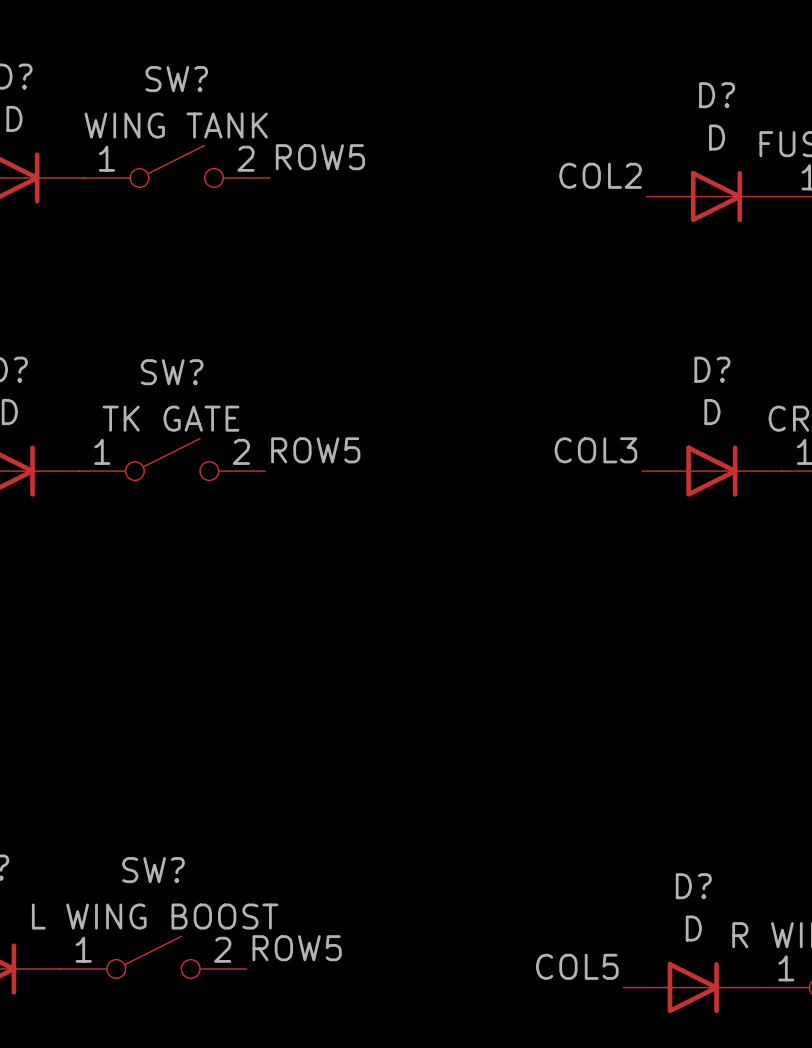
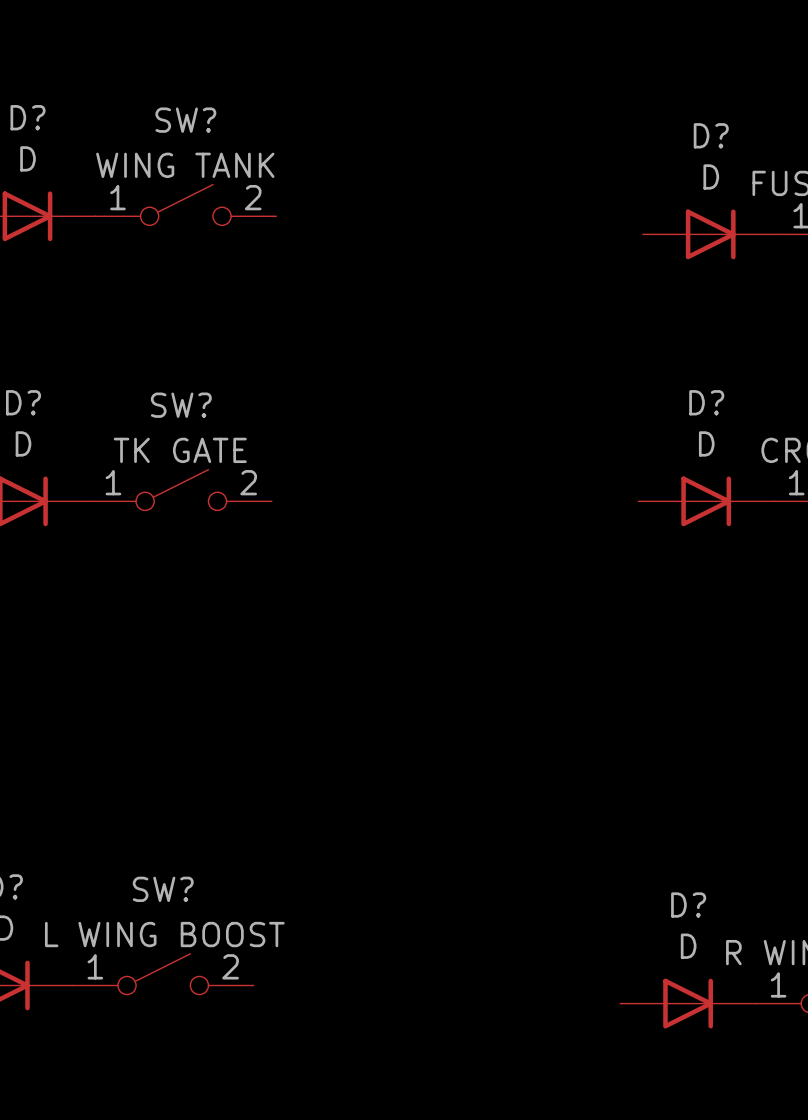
label: ROW5 (320, 157) -> none
label: COL2 (600, 175) -> none
label: ROW5 (315, 450) -> none
label: COL3 (595, 450) -> none
label: ROW5 (297, 948) -> none
label: COL5 (577, 966) -> none

